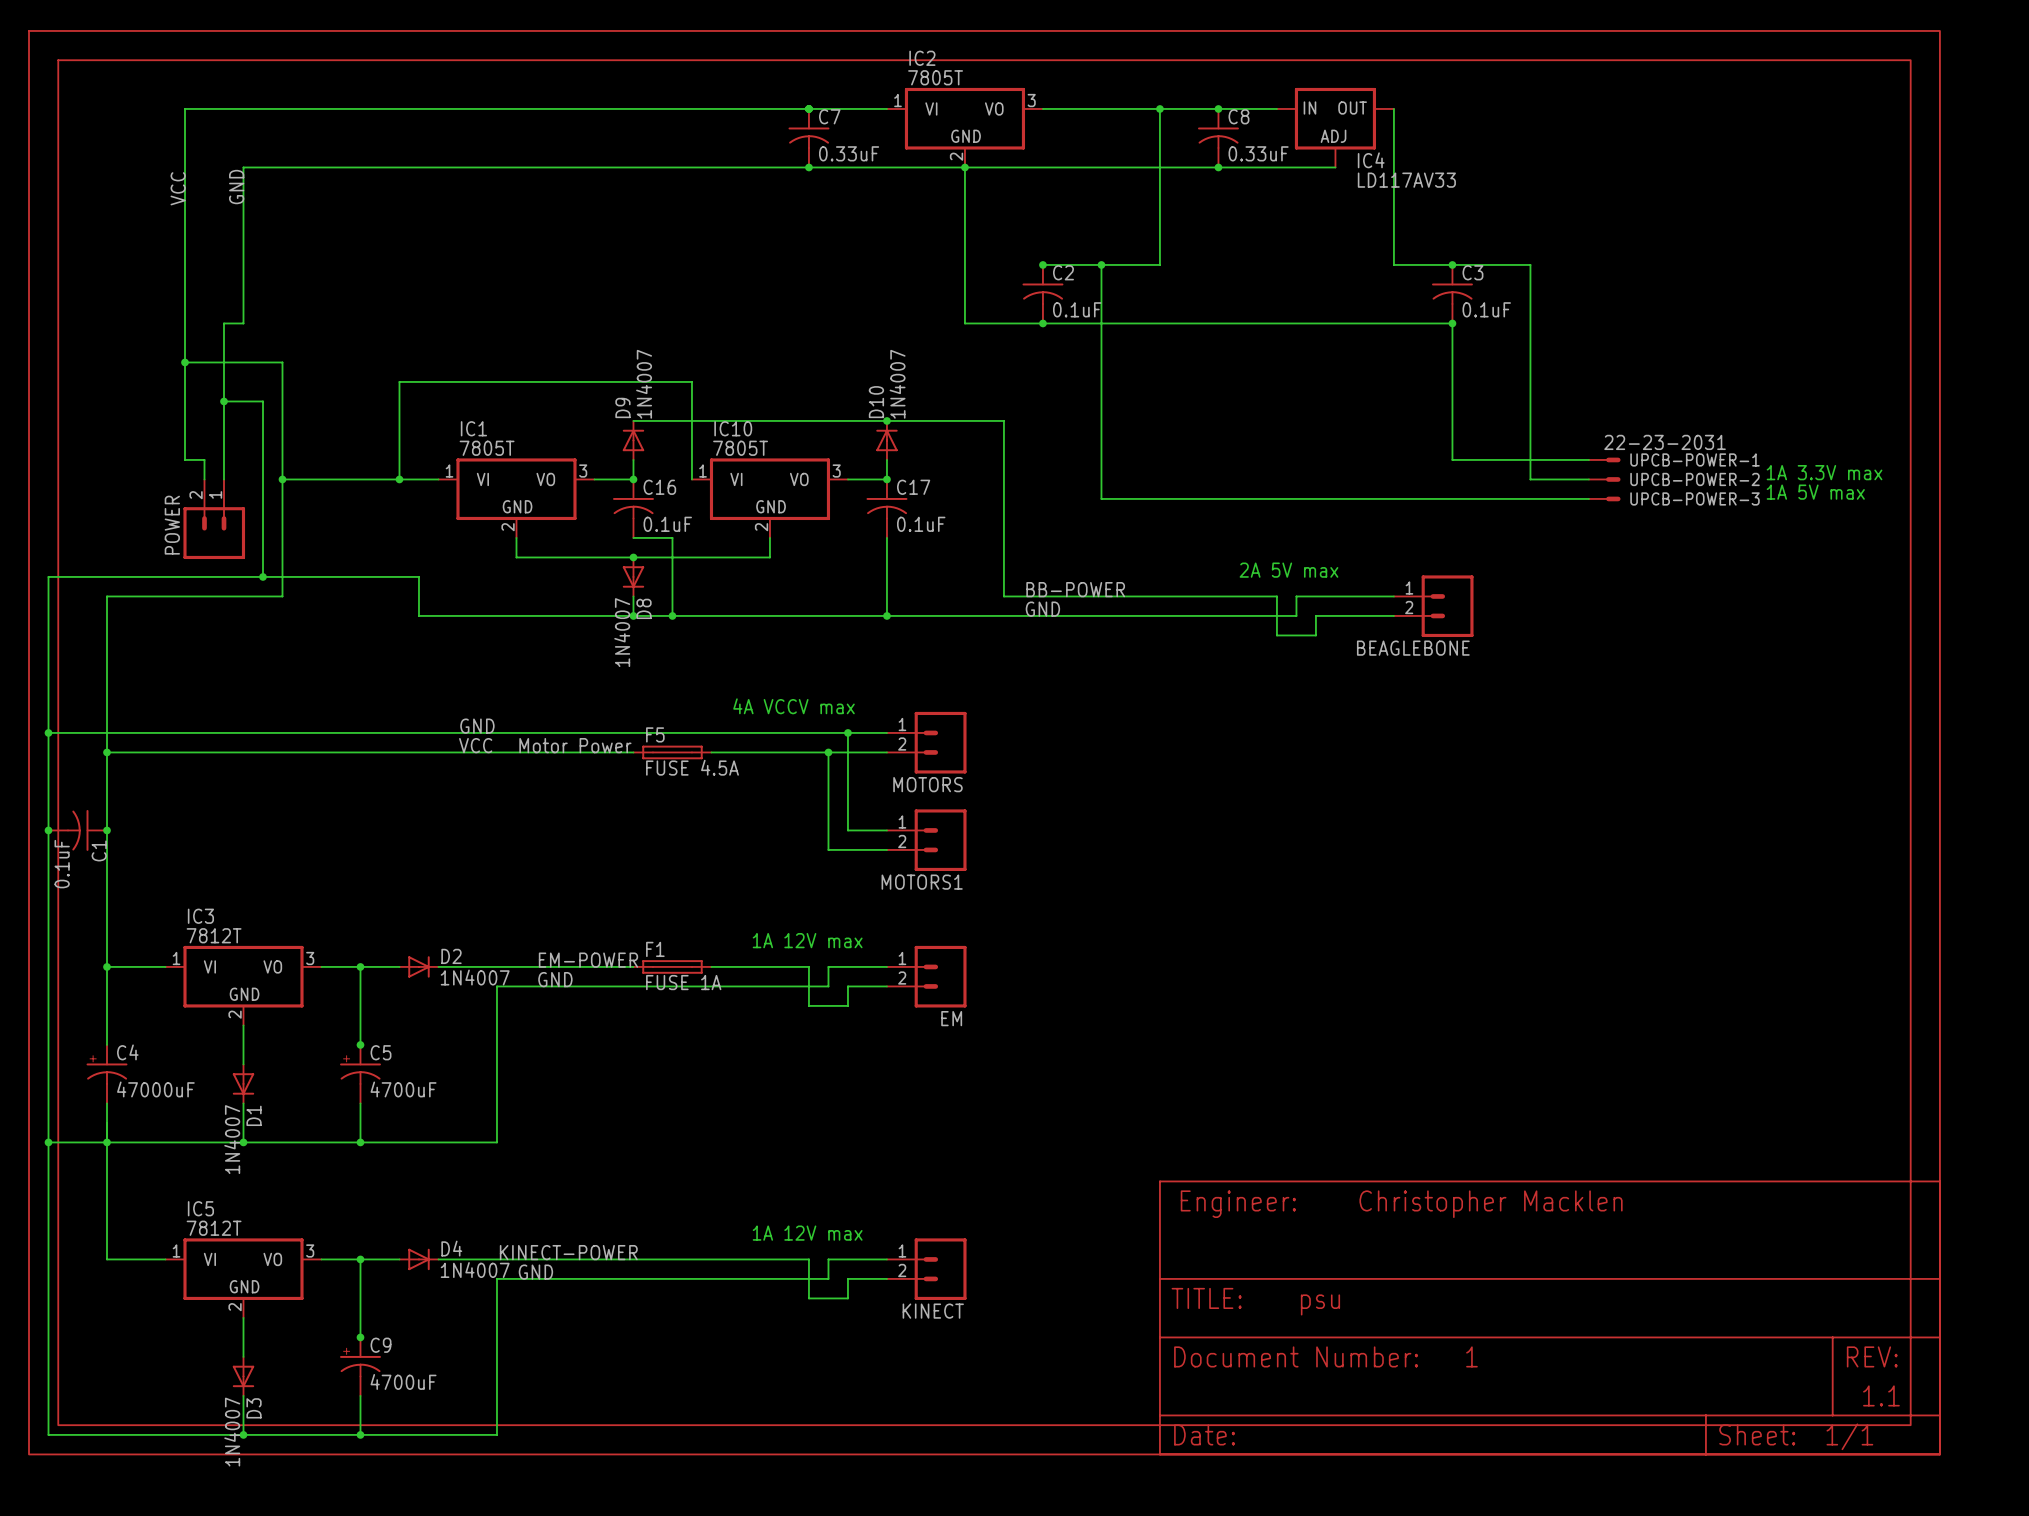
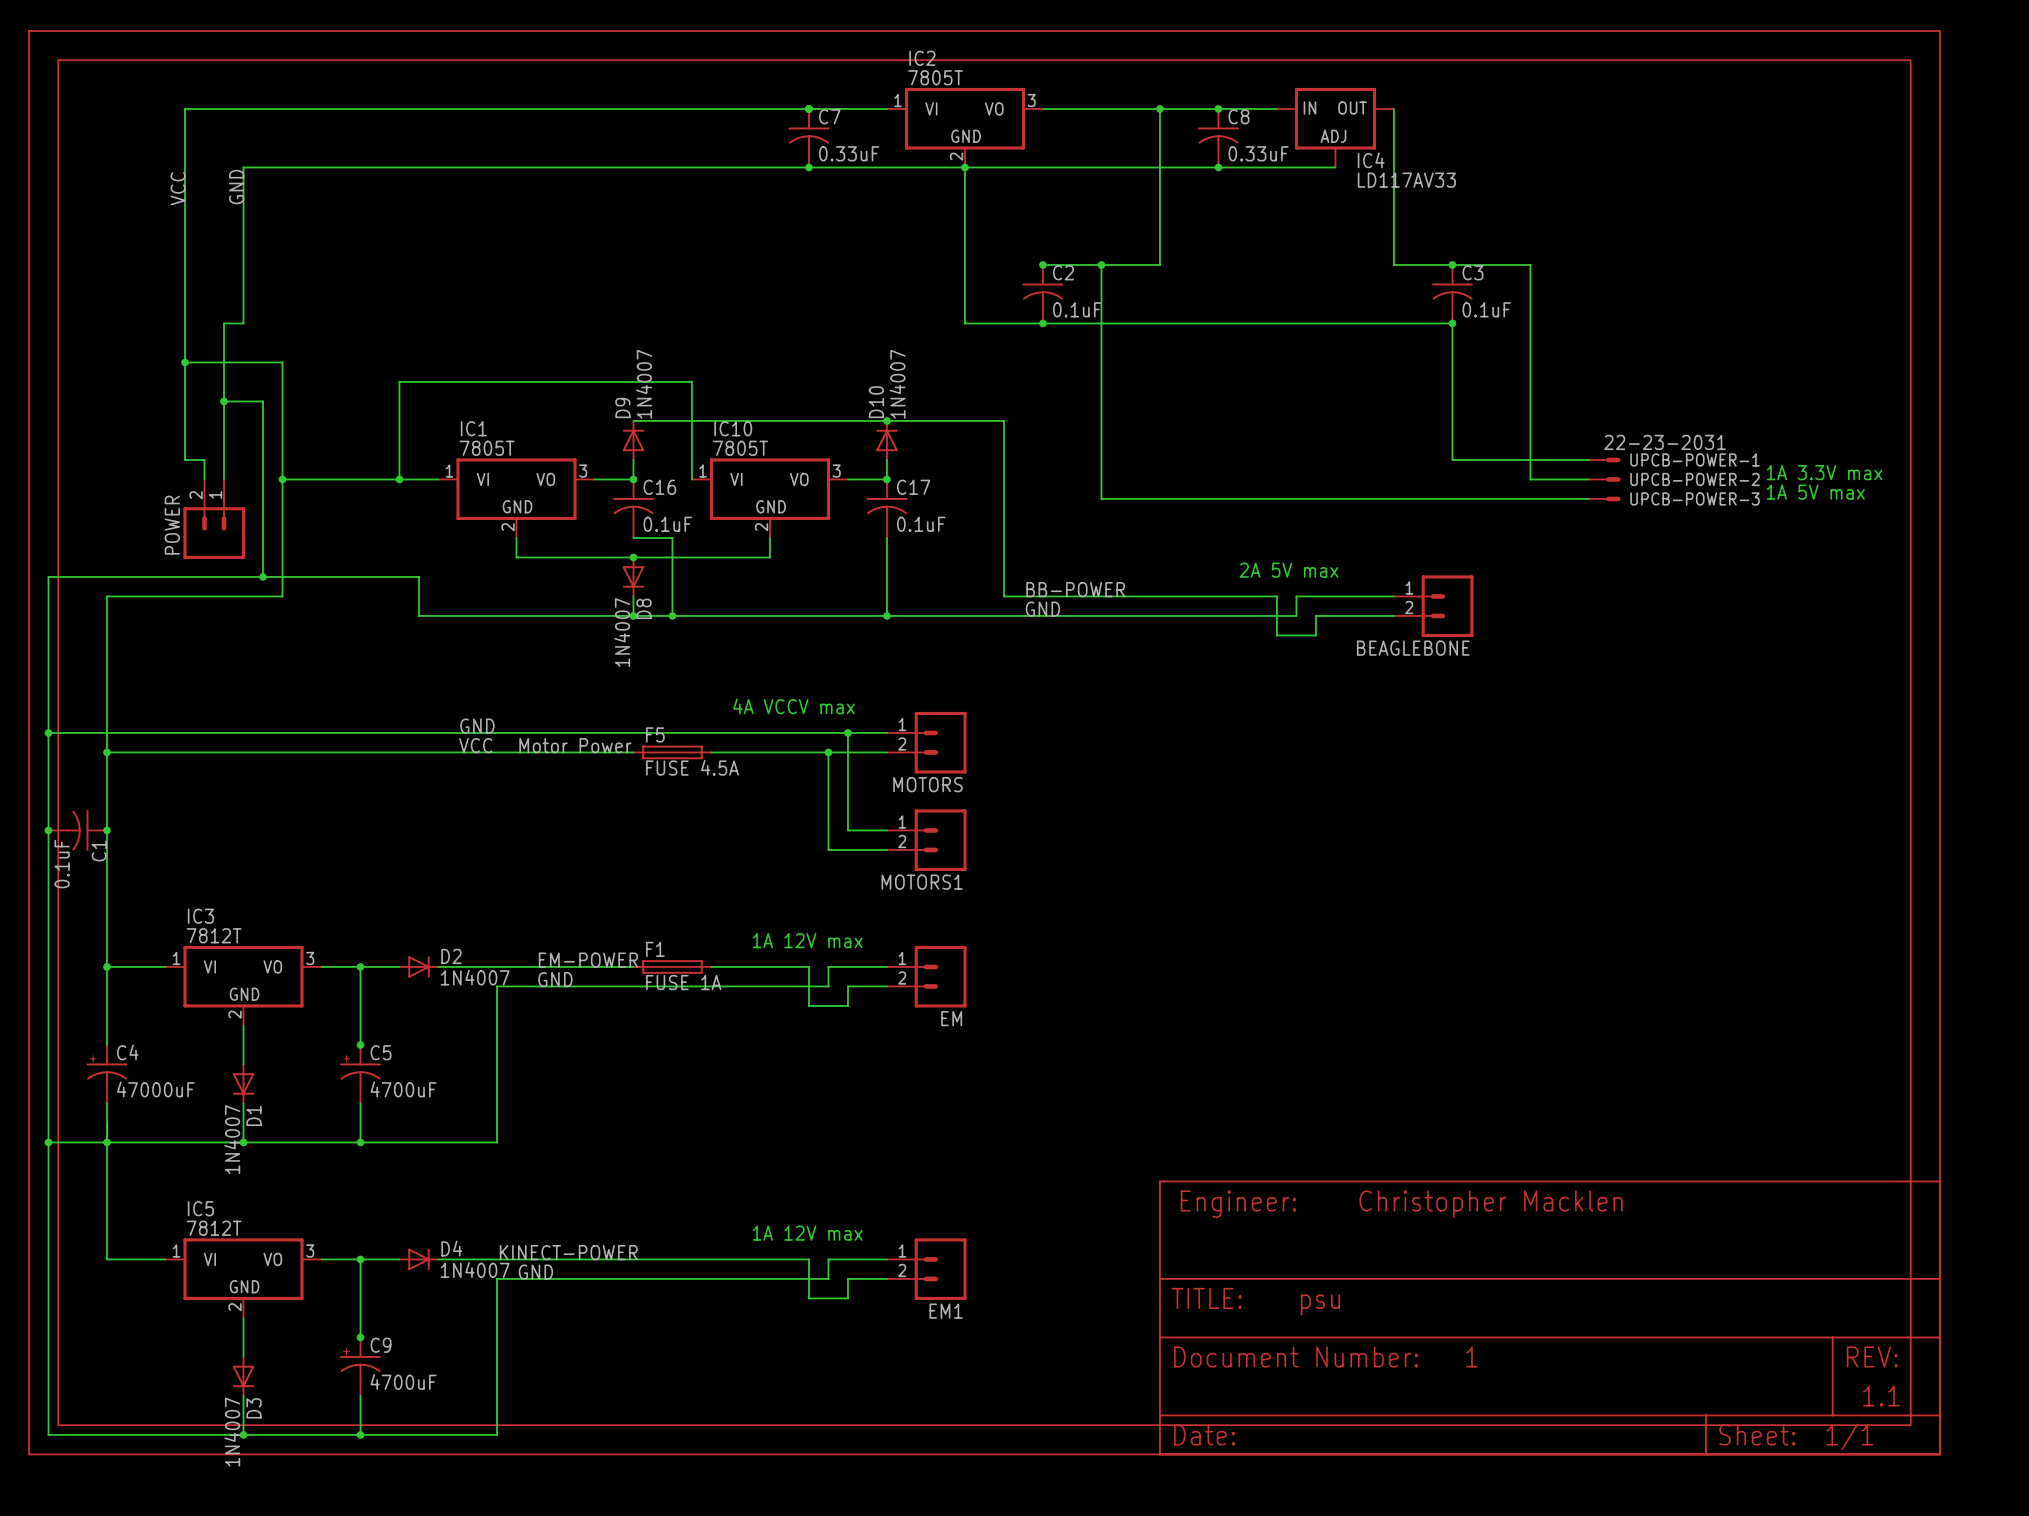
KINECT name: KINECT (933, 1311) -> EM1 (946, 1311)

